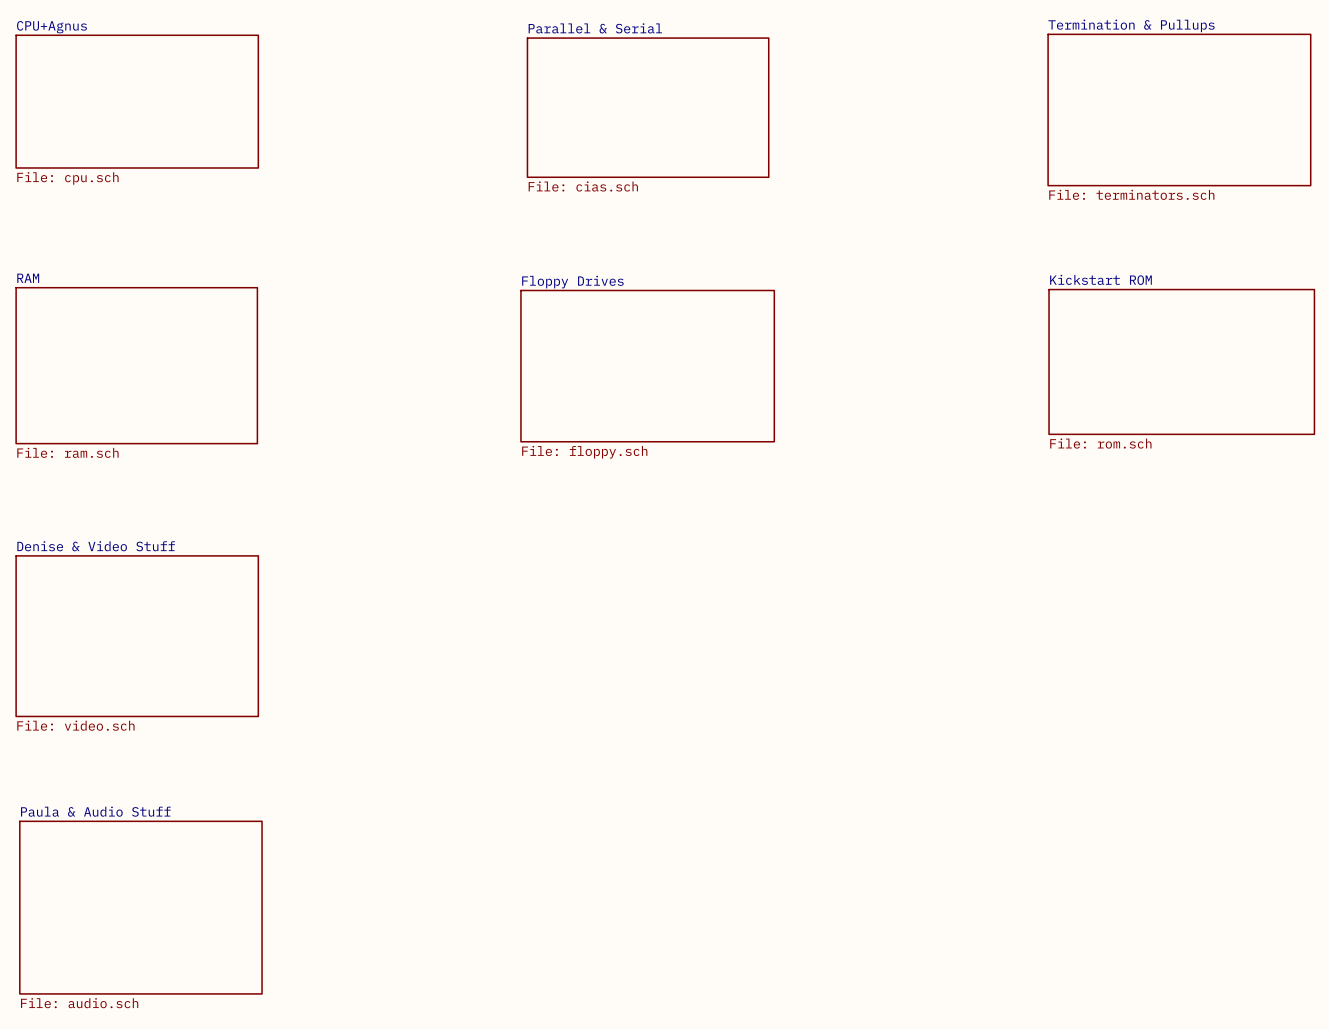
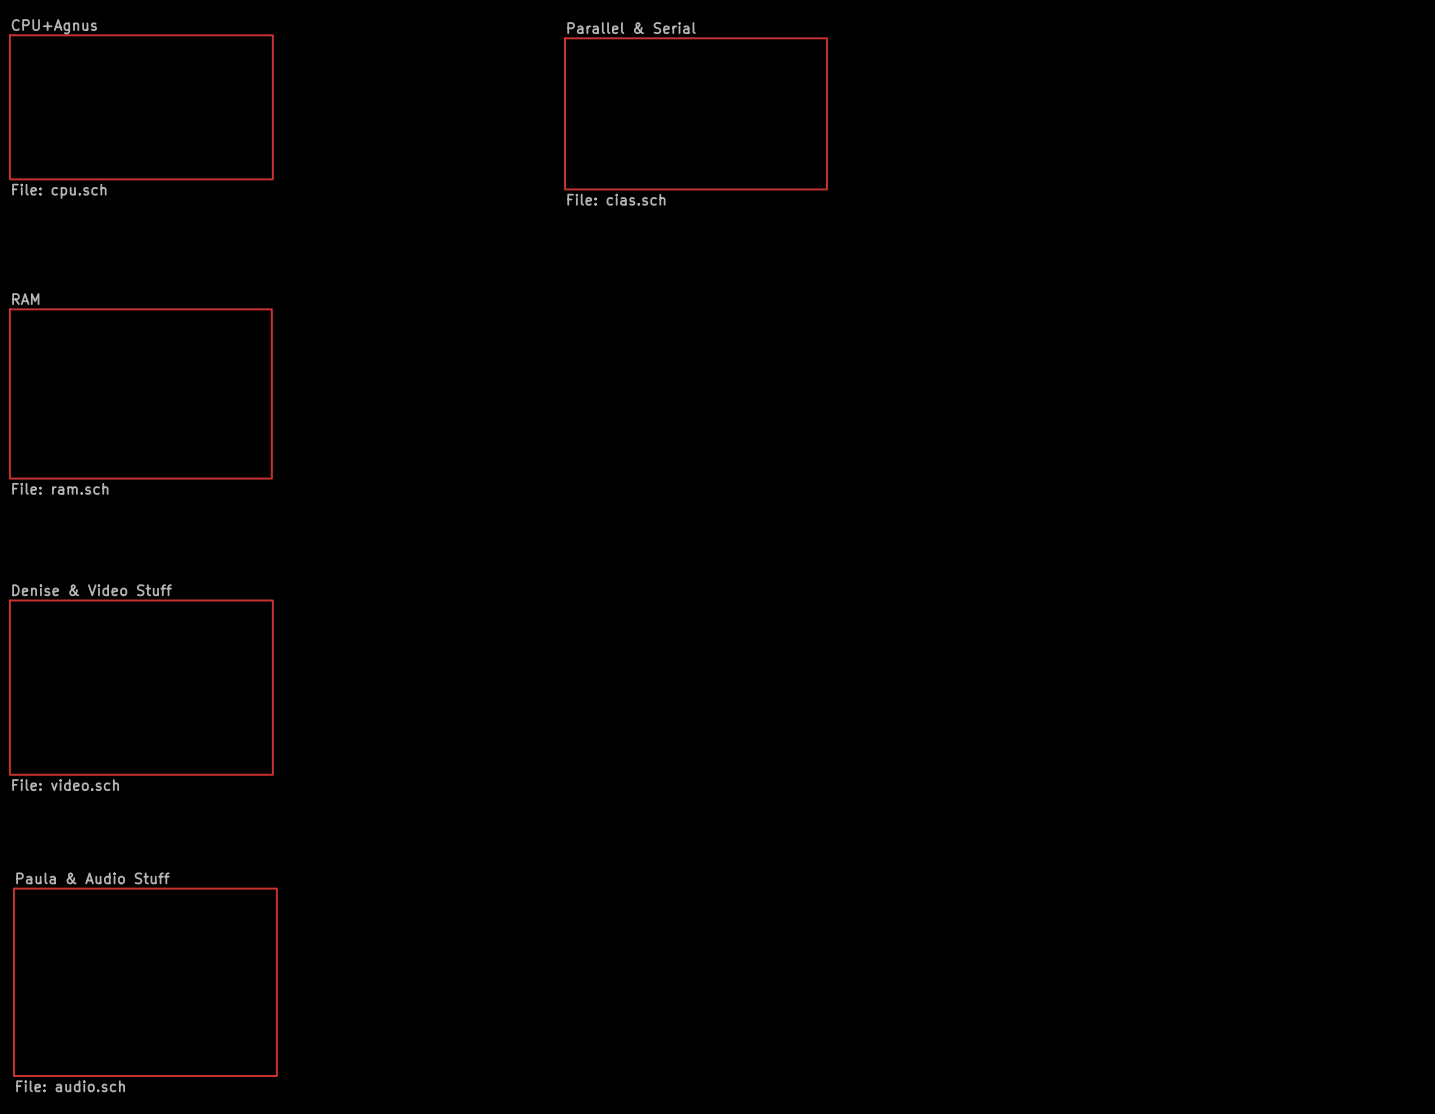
sheet Termination & Pullups: File: terminators.sch (1179, 109) -> none
sheet Kickstart ROM: File: rom.sch (1181, 361) -> none
sheet Floppy Drives: File: floppy.sch (647, 366) -> none

